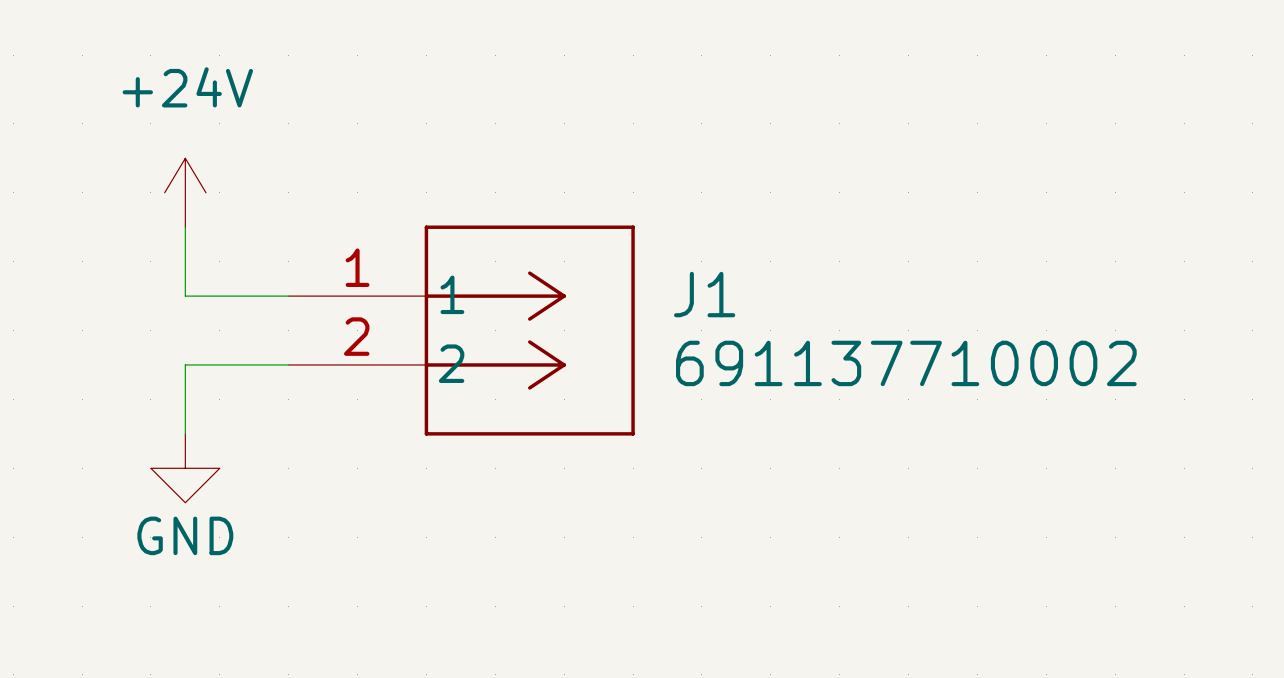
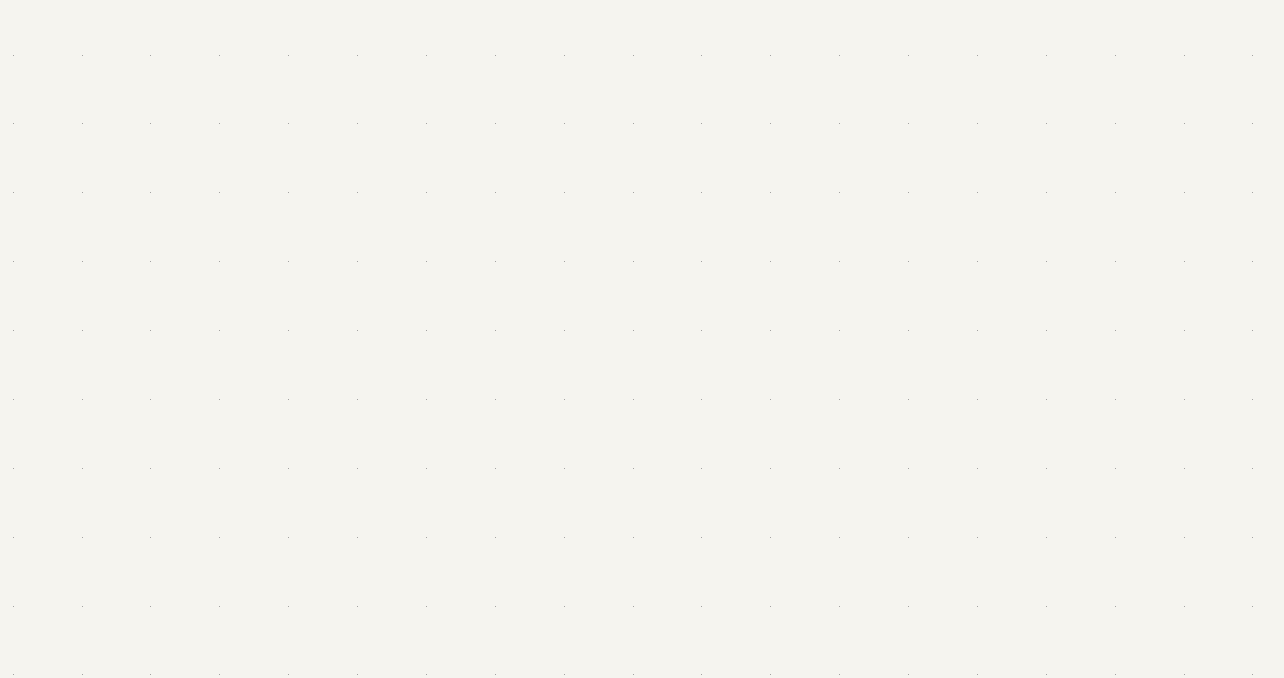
power symbol: +24V (185, 192) -> none
wire: (185, 227) (185, 296) (288, 296) -> none
J1: 691137710002 (461, 330) -> none
wire: (288, 364) (185, 364) (185, 433) -> none
power symbol: GND (185, 468) -> none

